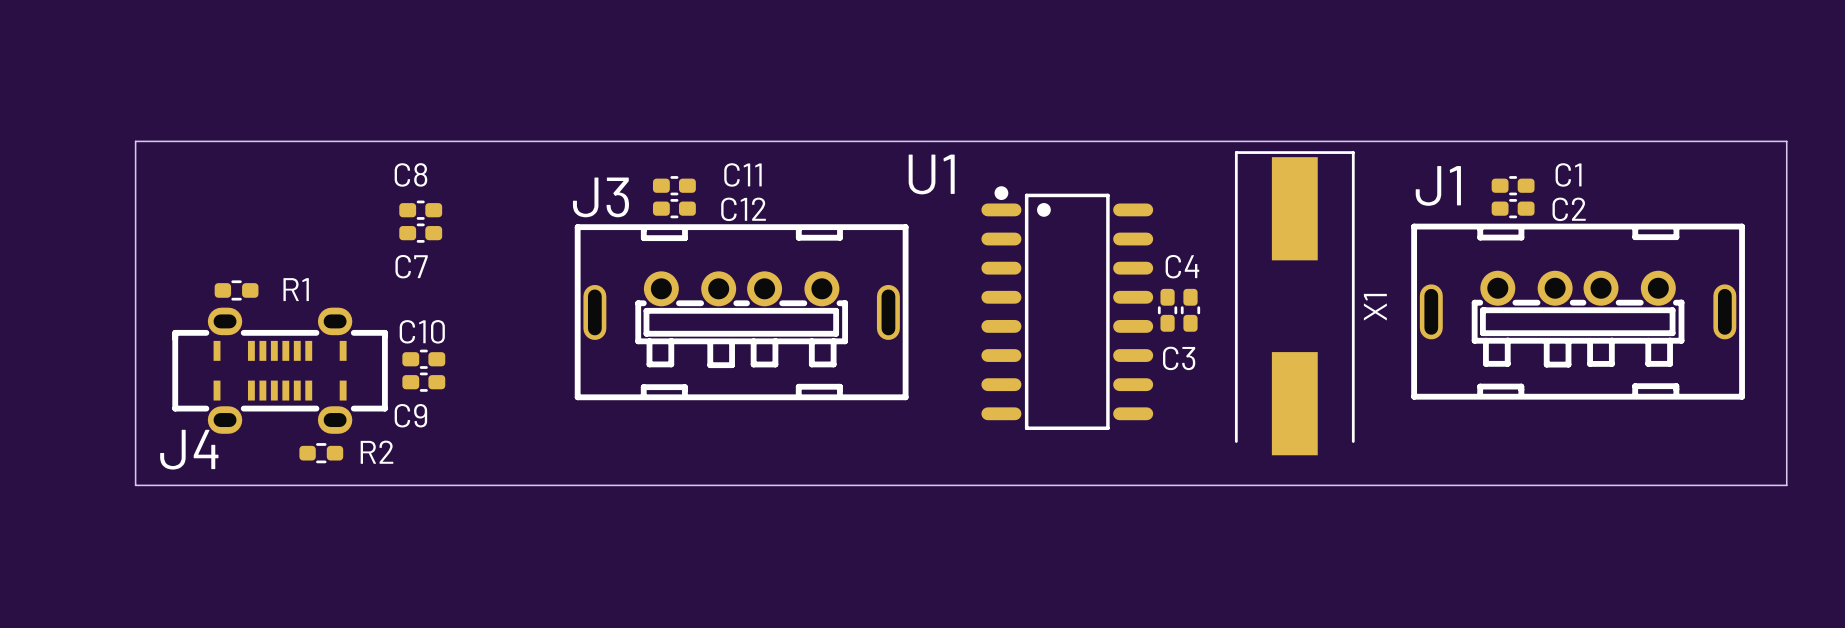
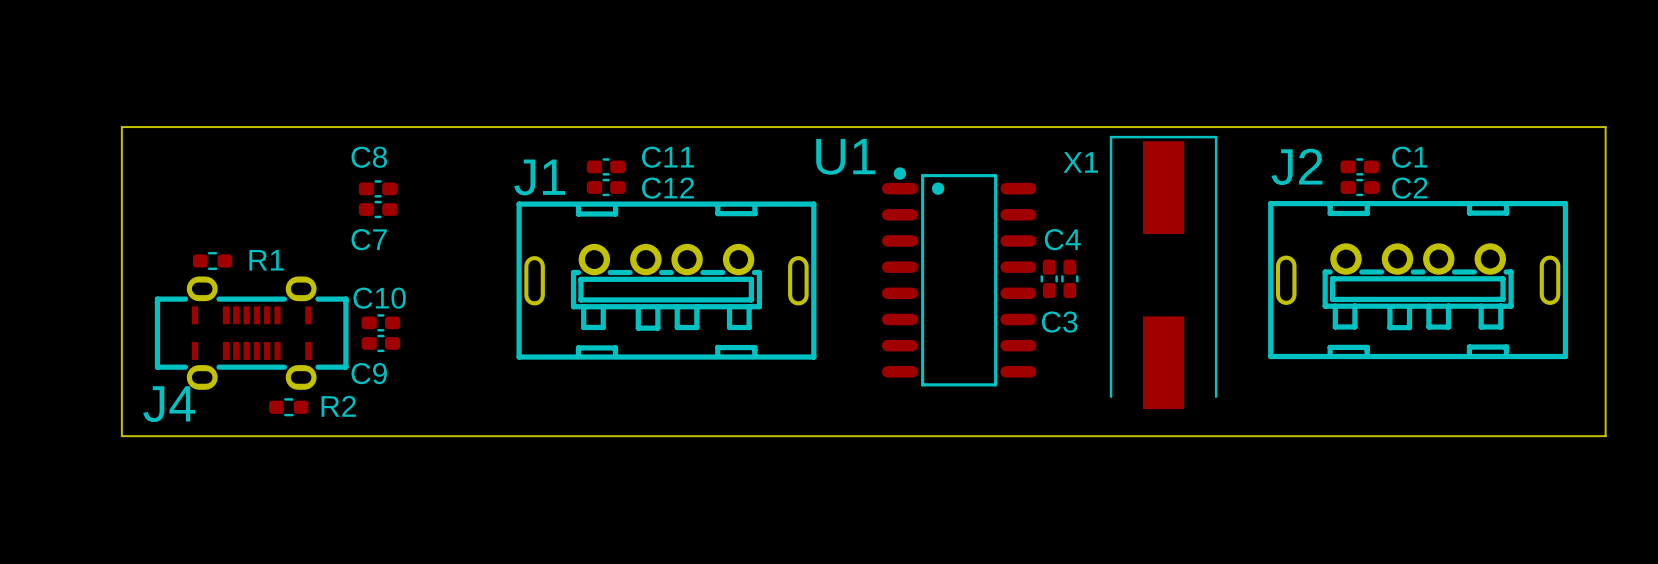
J1 name: J1 (1438, 185) -> J2 (1297, 166)
J3 name: J3 (600, 197) -> J1 (539, 177)
X1 name rotation: 0° (1375, 307) -> 90° clockwise (1080, 162)
X1 name position: X1 (1375, 307) -> X1 (1080, 162)

